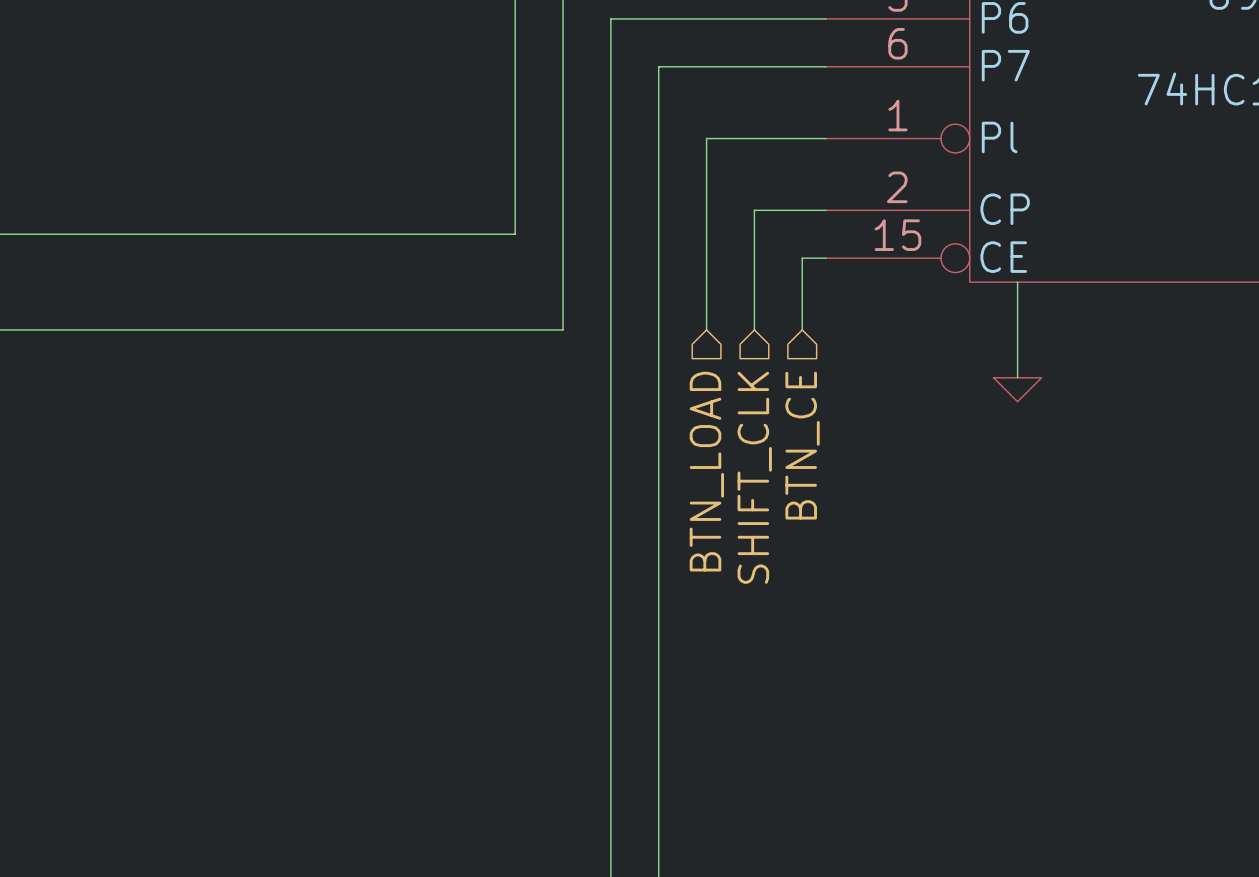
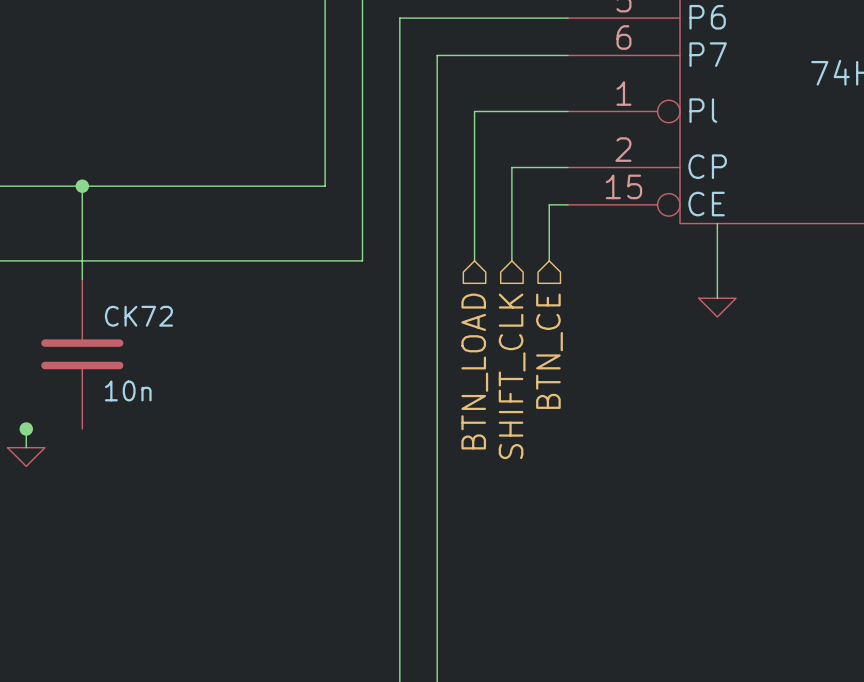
wire: none -> (82, 186) (82, 279)
junction: none -> (82, 186)
CK72: none -> 10n (82, 354)
wire: none -> (26, 429) (26, 447)
junction: none -> (26, 429)
power symbol: none -> (26, 457)

